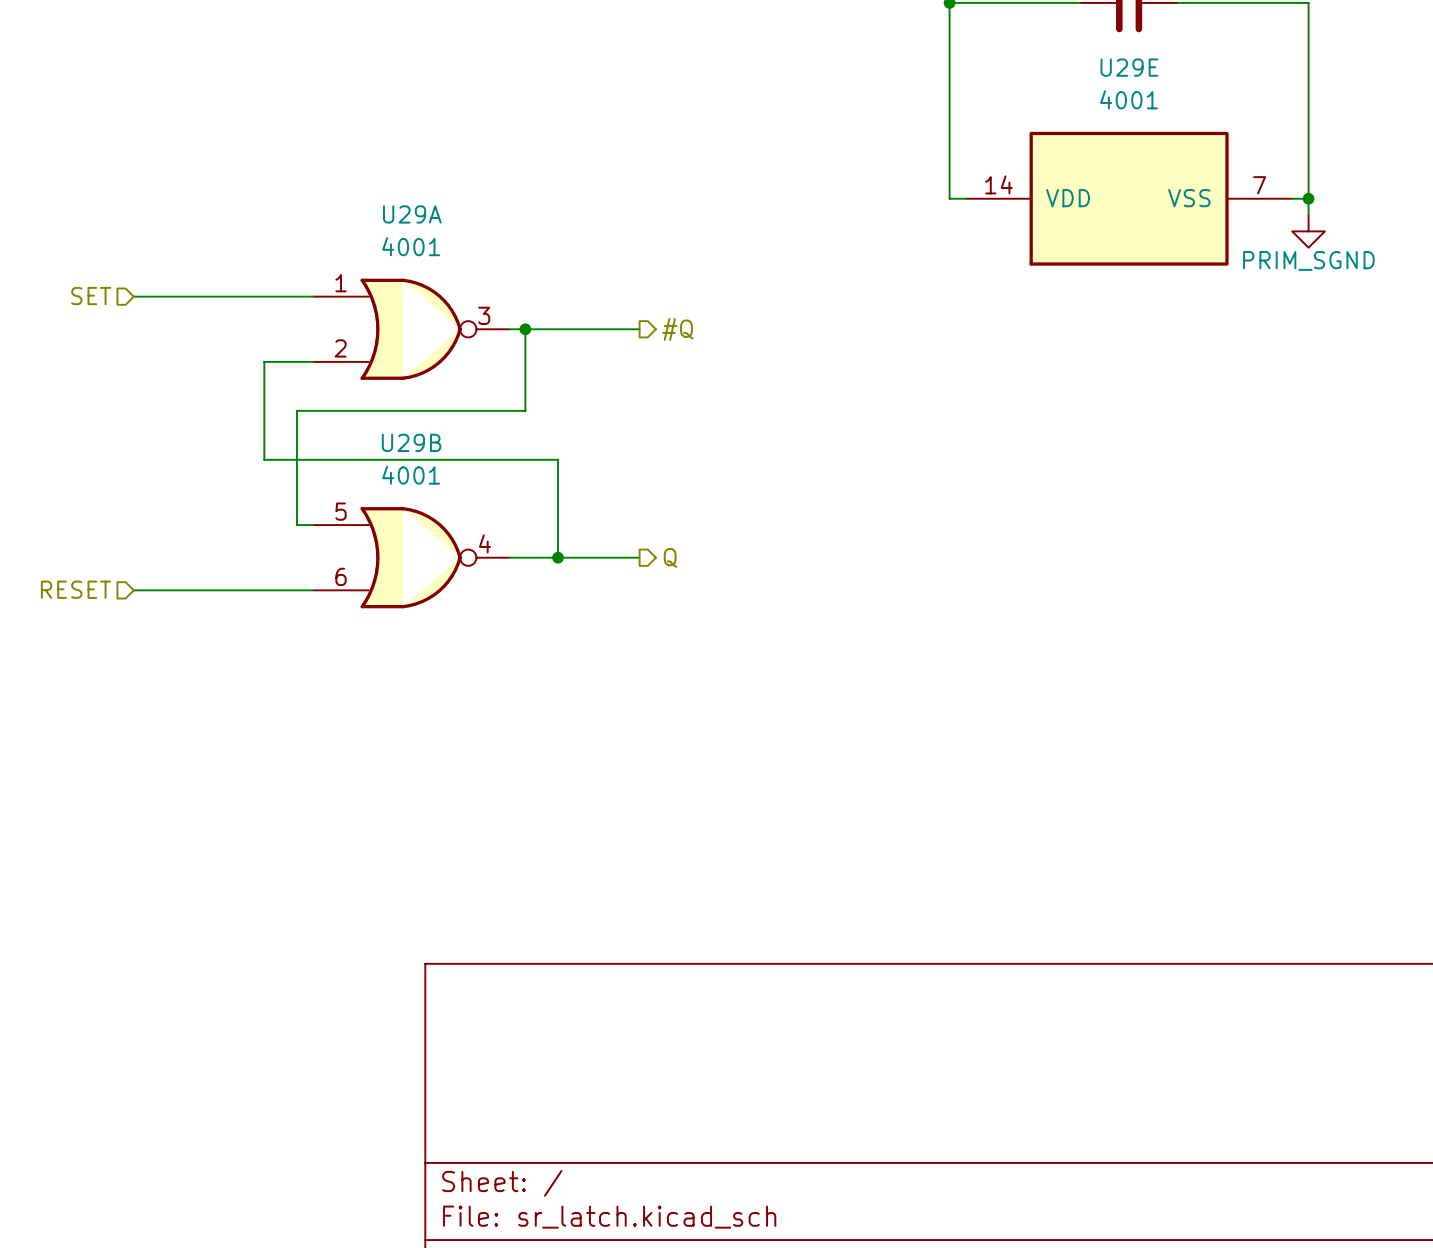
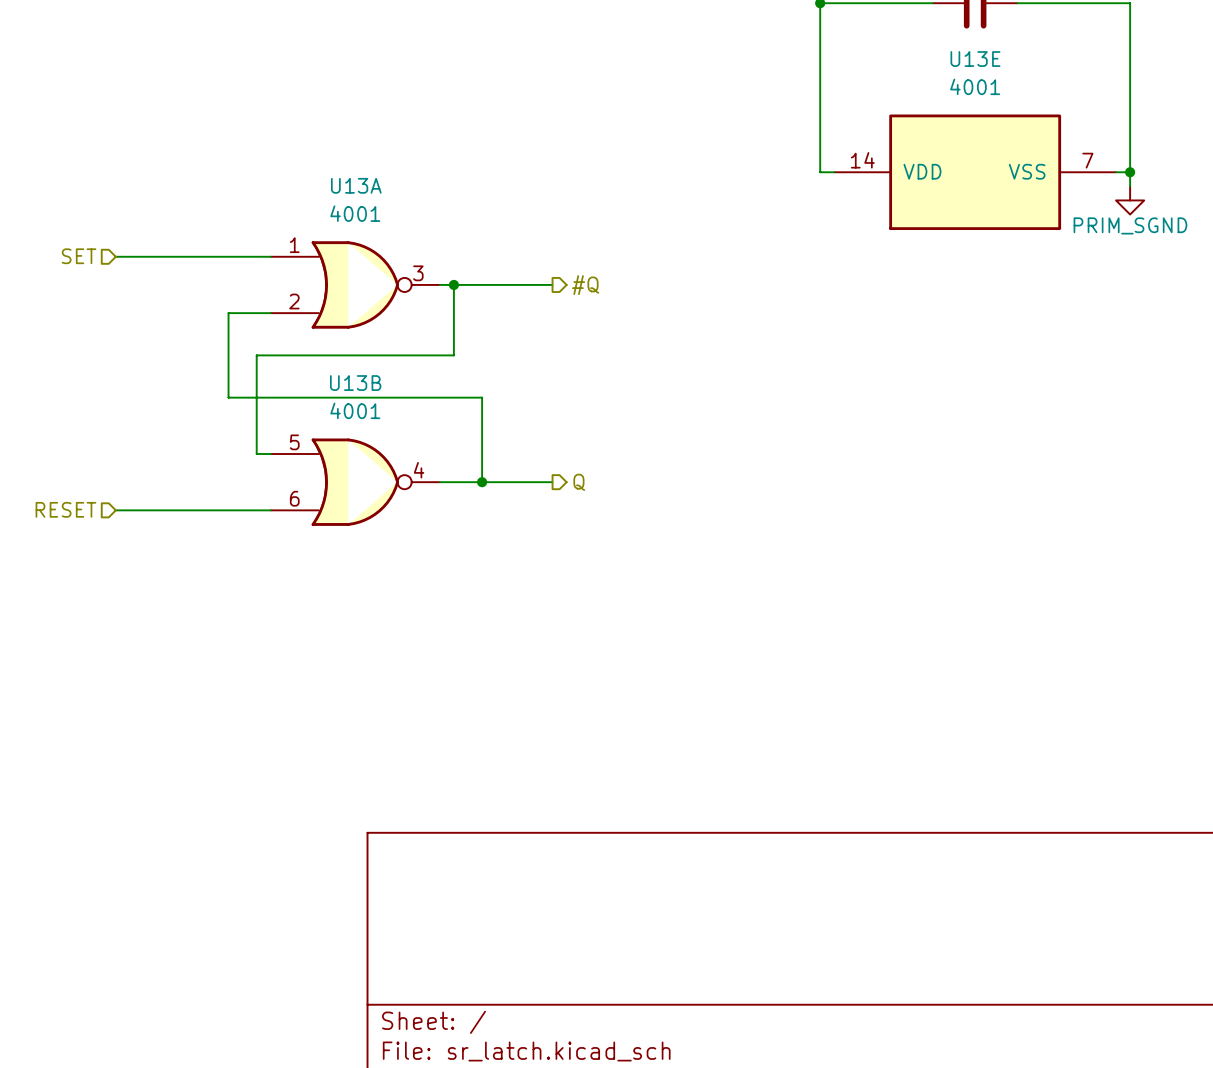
U29E name: U29E (1129, 67) -> U13E (975, 59)
U29A name: U29A (412, 214) -> U13A (356, 185)
U29B name: U29B (411, 442) -> U13B (355, 383)

